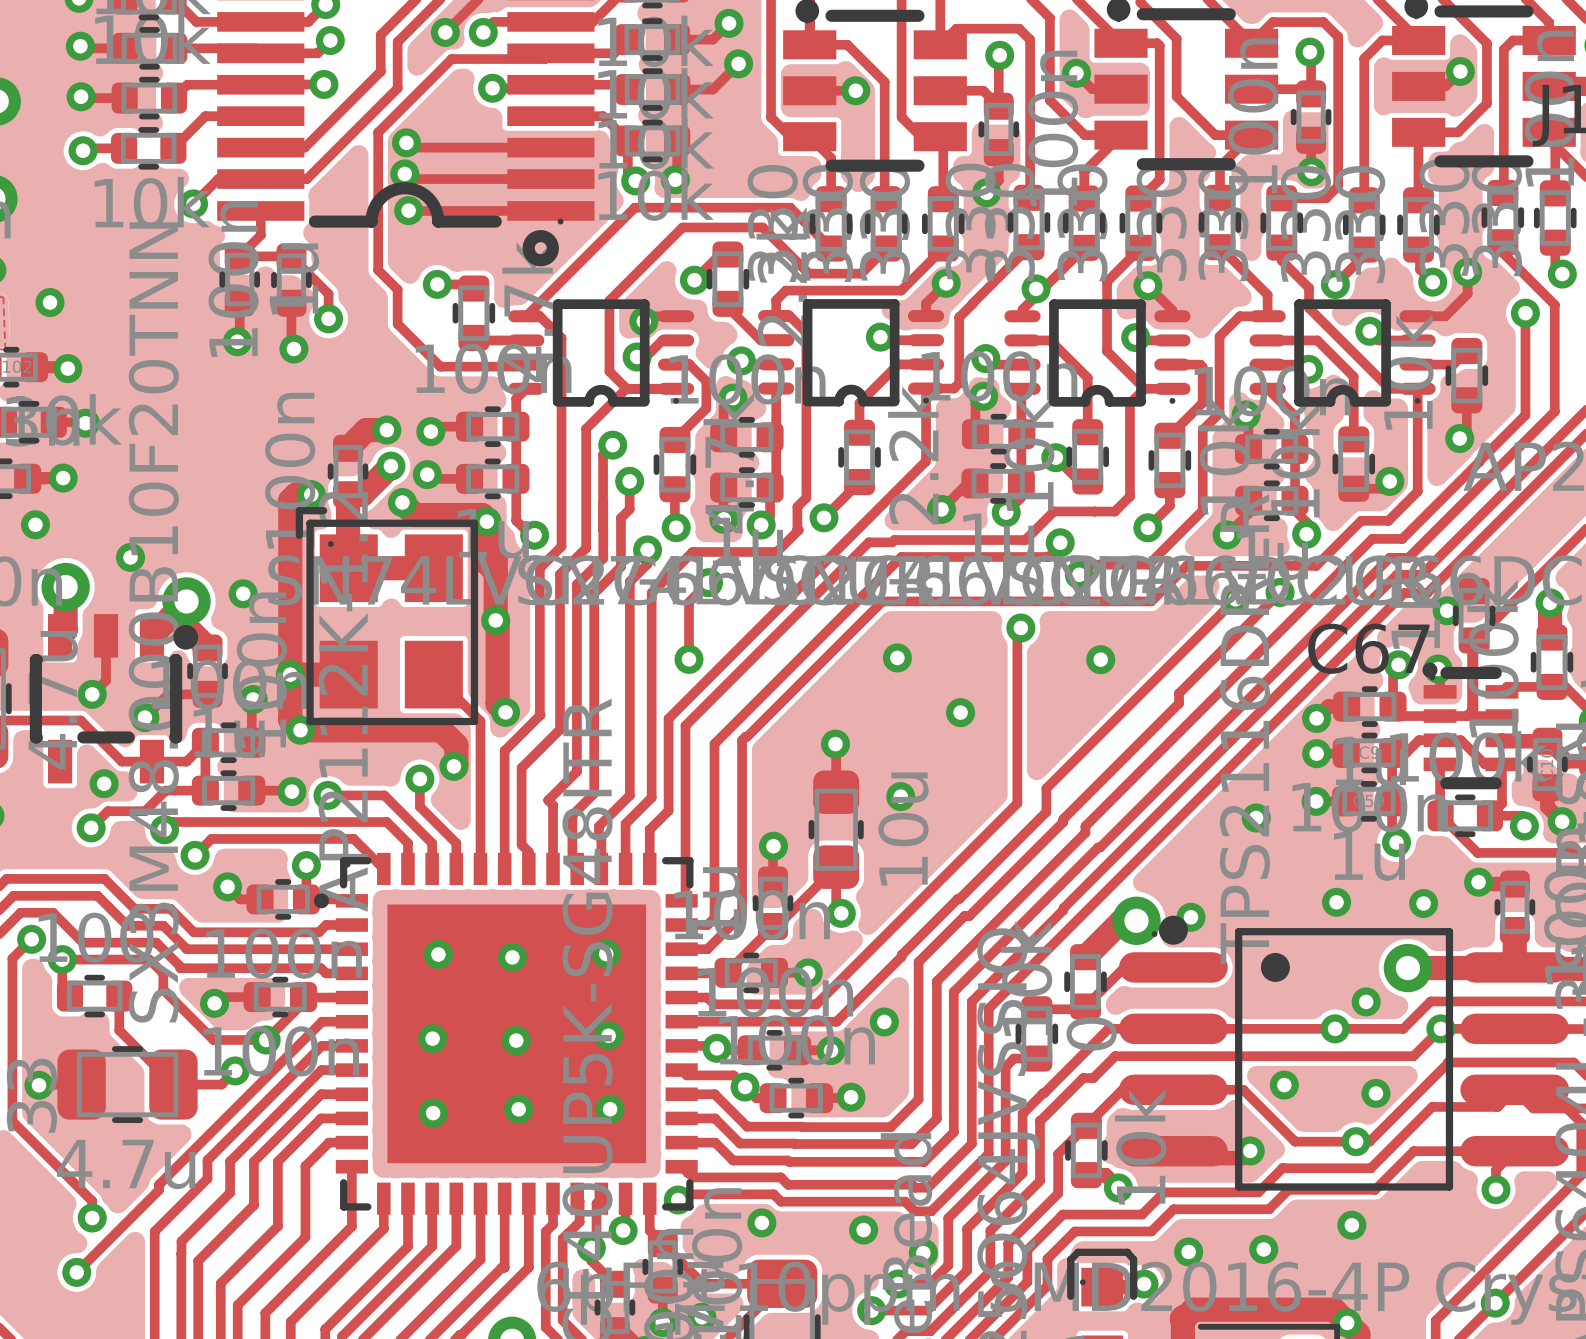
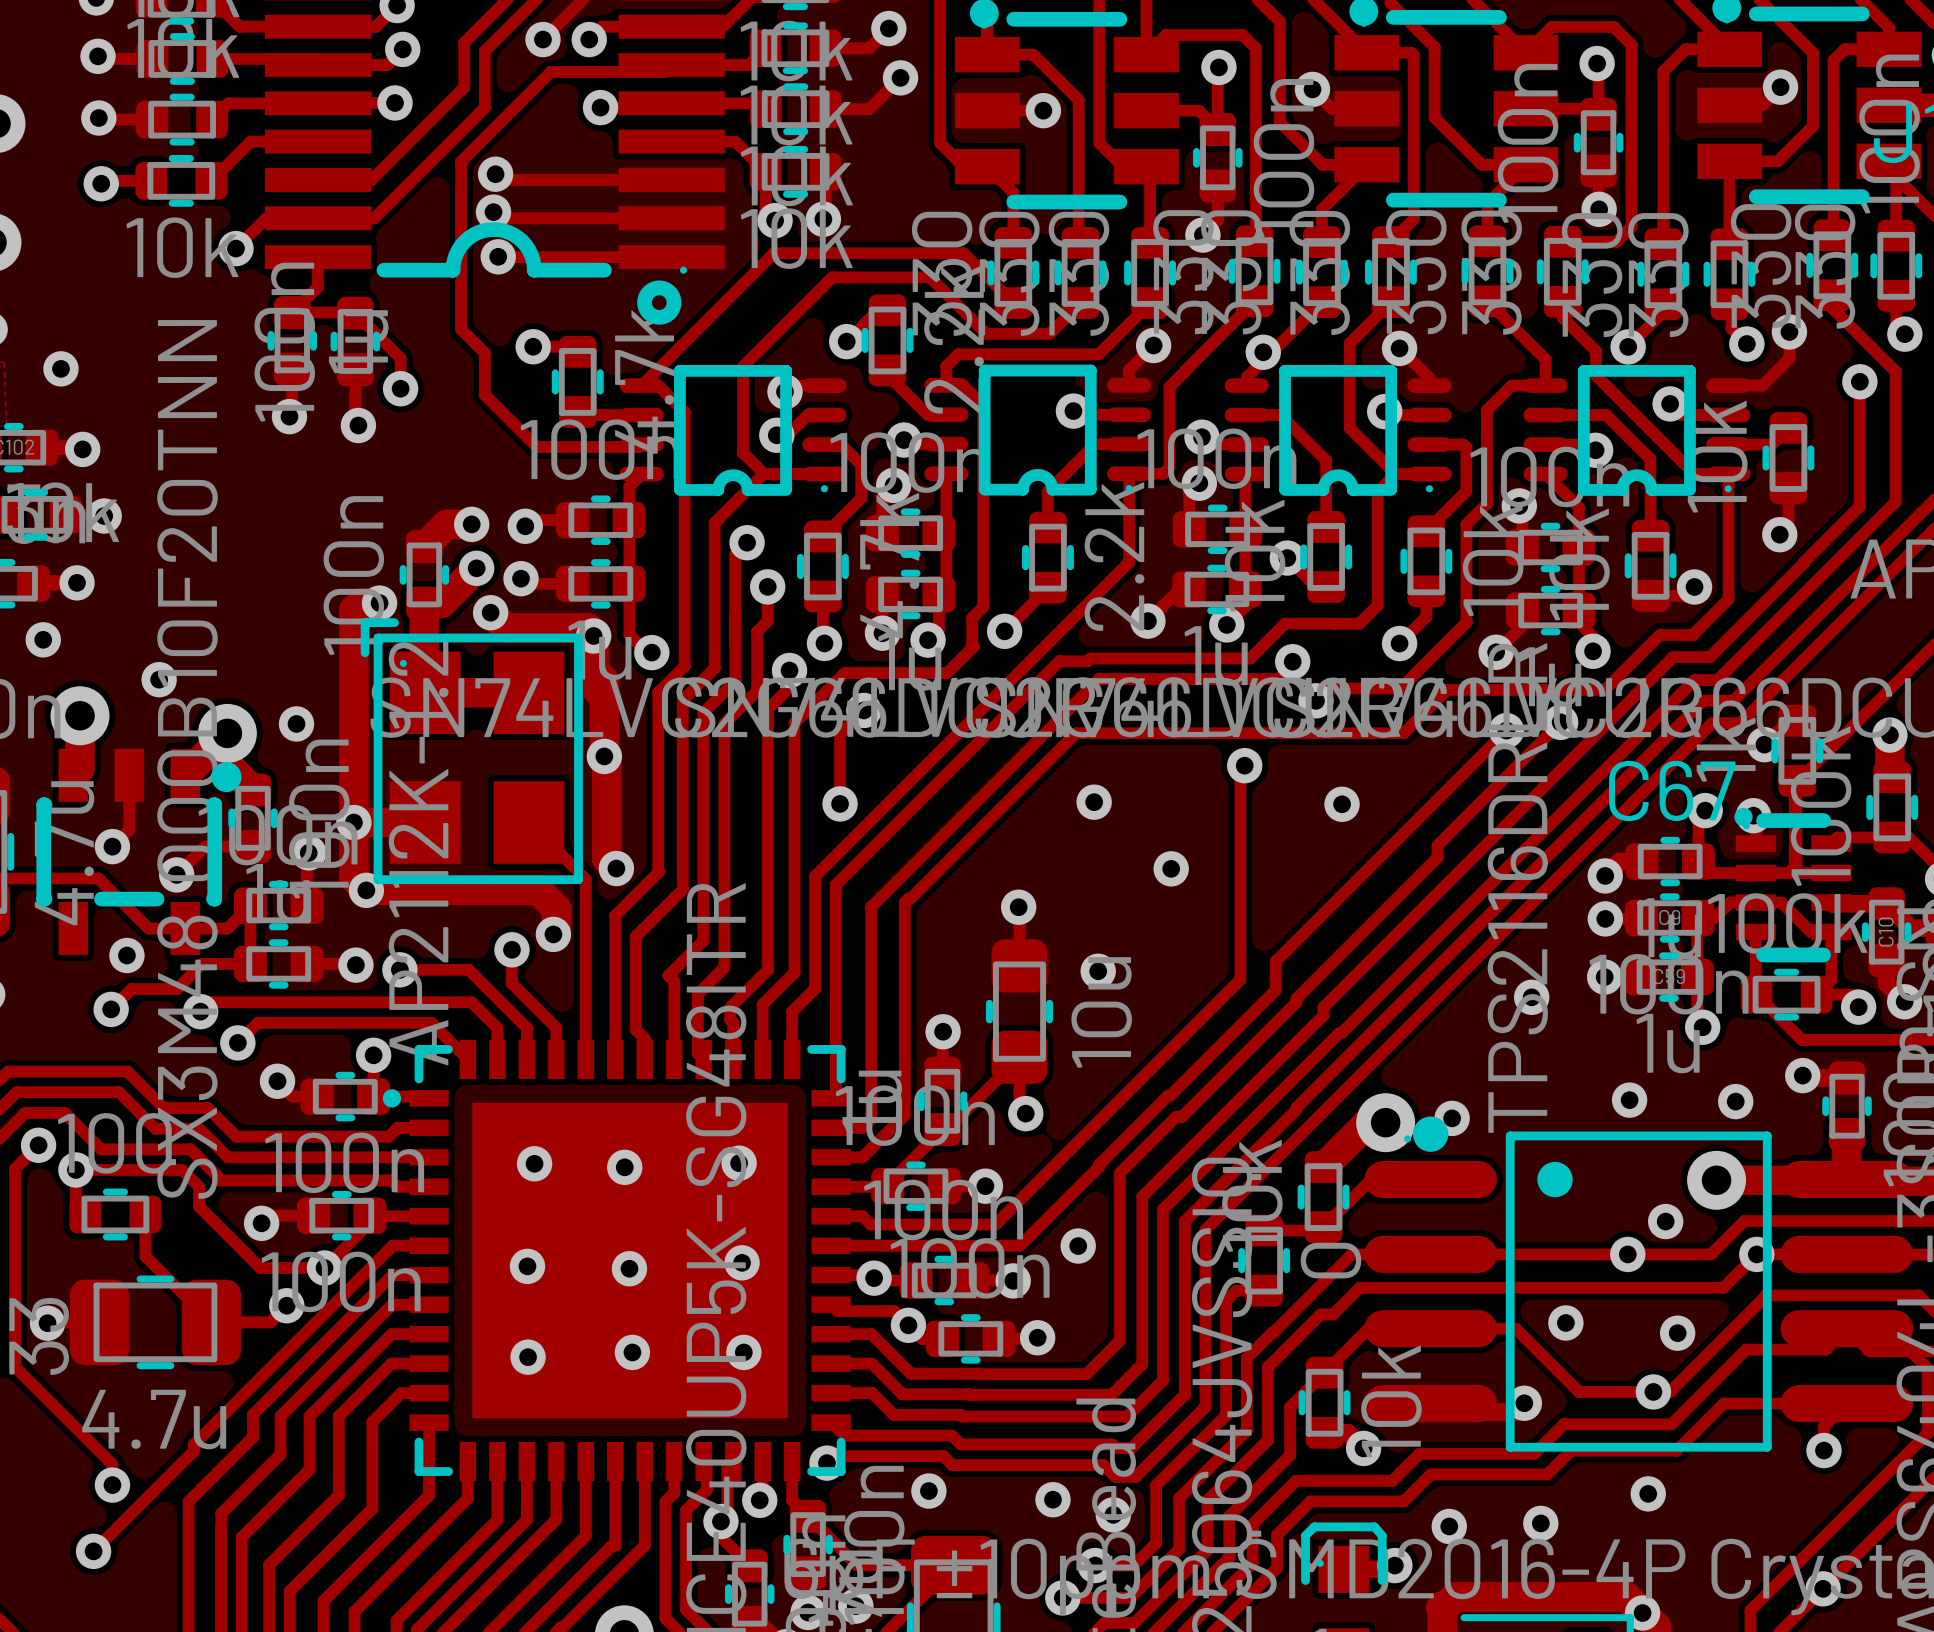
via position: (923, 1253) -> (1113, 1514)

